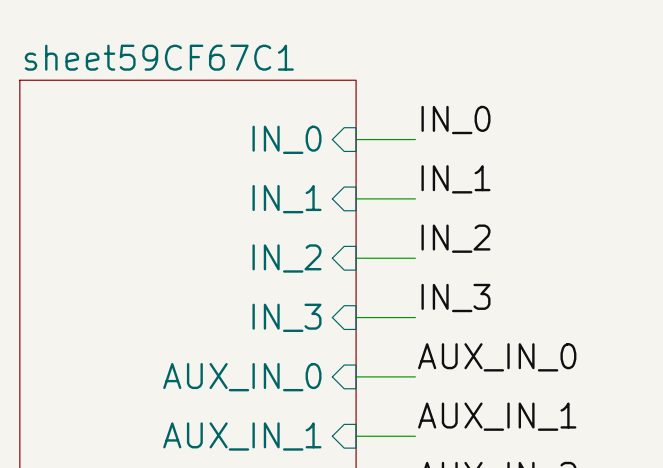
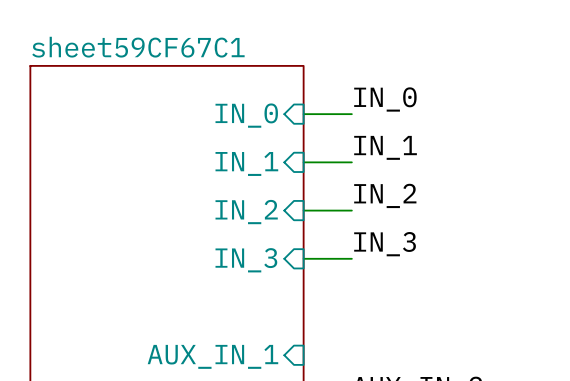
label: AUX_IN_0 (497, 357) -> none
wire: (356, 376) (415, 376) -> none
sheet pin: AUX_IN_0 (242, 377) -> none
label: AUX_IN_1 (497, 416) -> none
wire: (356, 436) (415, 436) -> none

